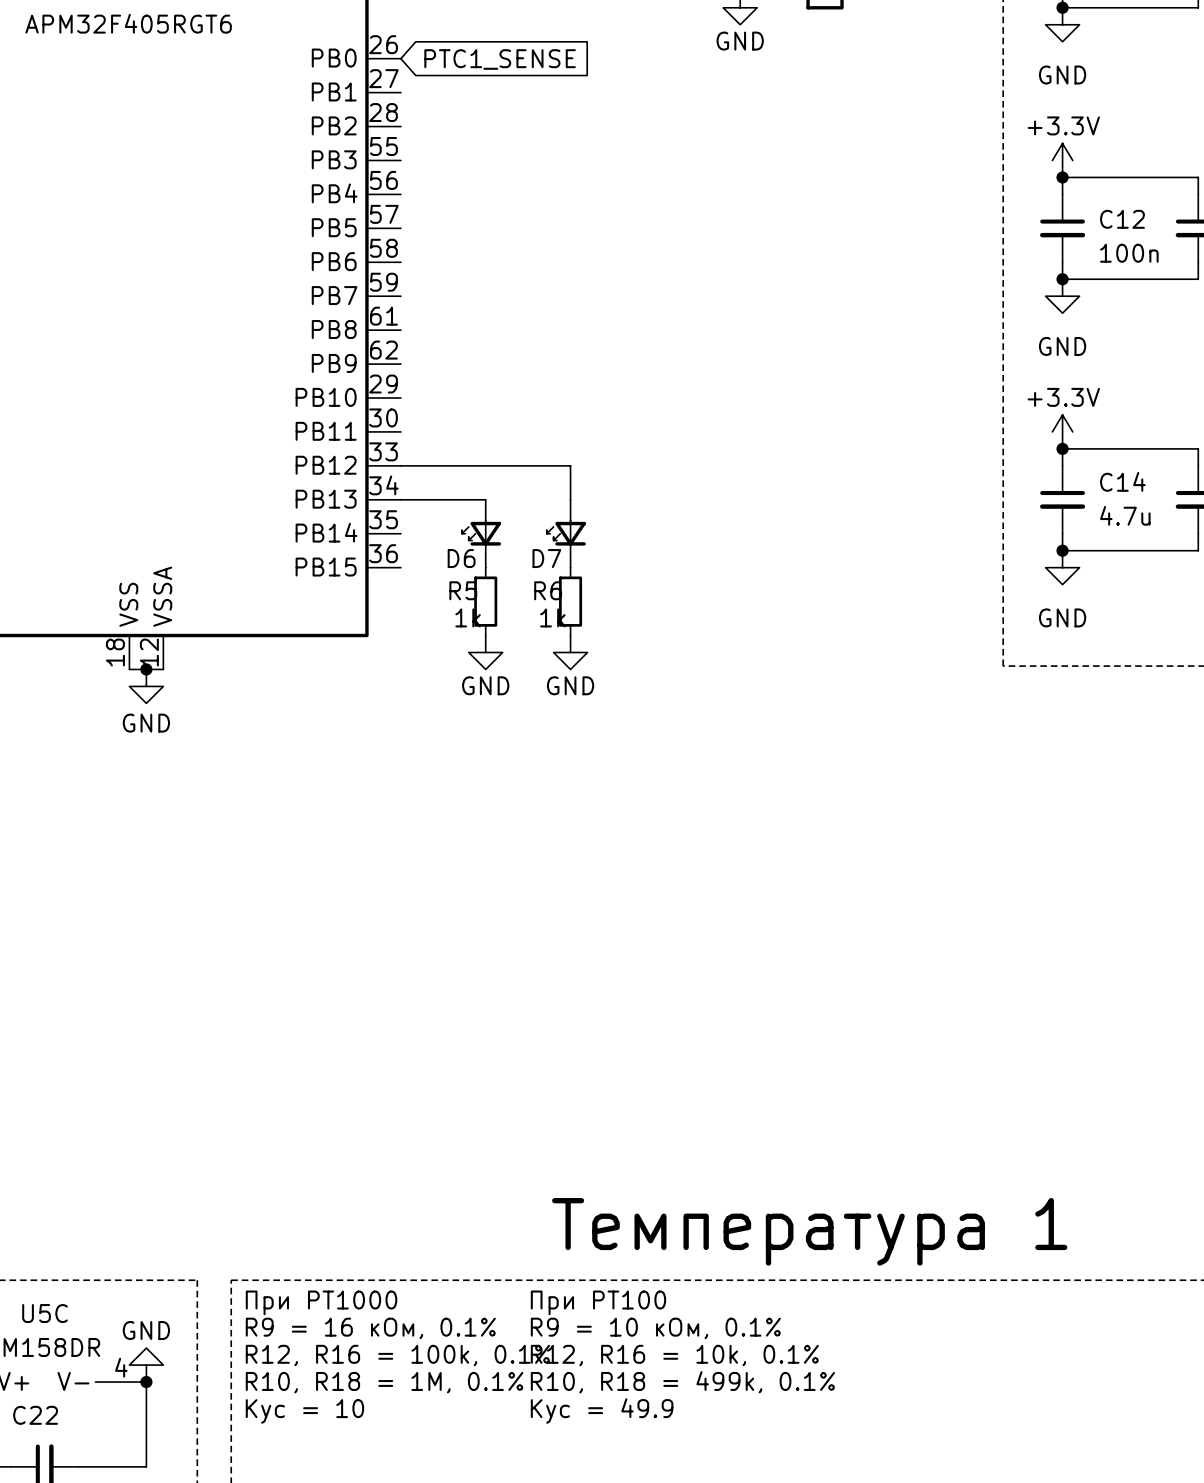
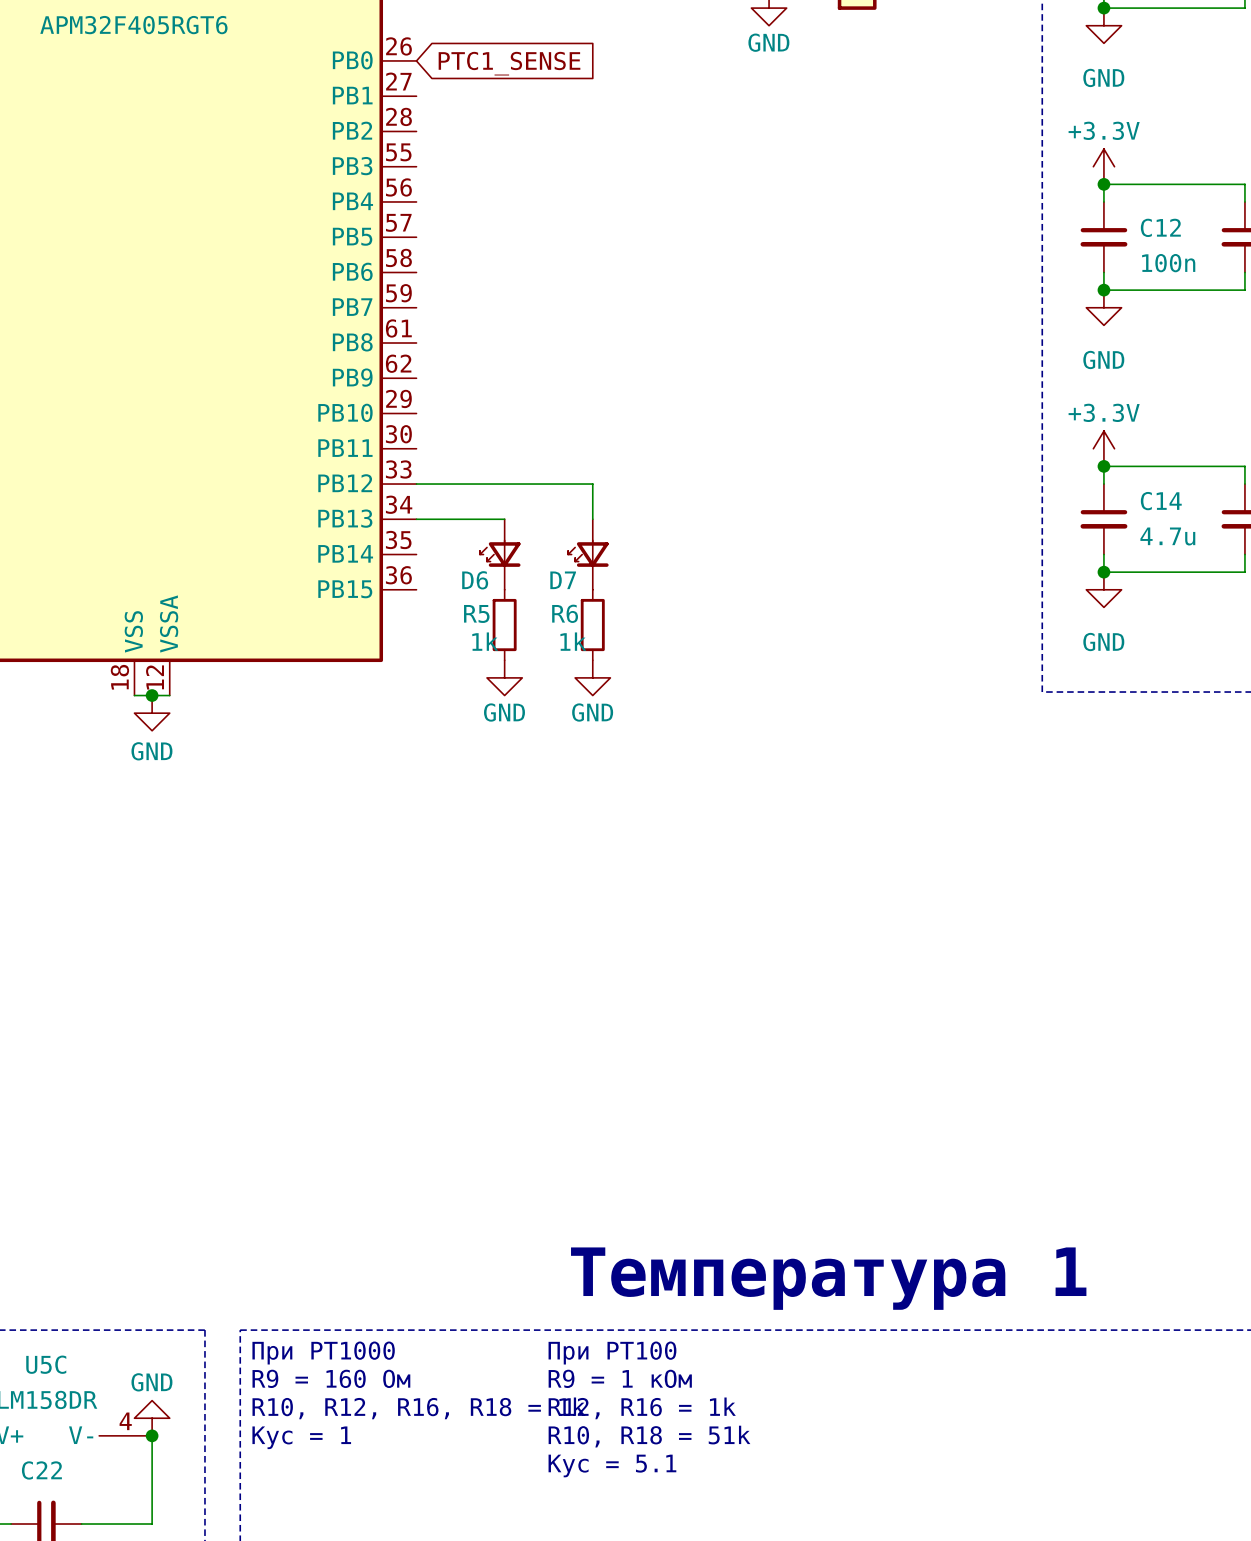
text: R9 = 16 кОм, 0.1% (370, 1328) -> R9 = 160 Ом (331, 1378)
text: R9 = 10 кОм, 0.1% (655, 1328) -> R9 = 1 кОм (620, 1378)
text: R12, R16 = 100k, 0.1% (397, 1355) -> R10, R12, R16, R18 = 1k (418, 1408)
text: R12, R16 = 10k, 0.1% (674, 1355) -> R12, R16 = 1k (642, 1408)
text: R10, R18 = 1M, 0.1% (384, 1382) -> Кус = 1 (301, 1437)
text: R10, R18 = 499k, 0.1% (682, 1382) -> R10, R18 = 51k (649, 1436)
text: Кус = 10 (304, 1411) -> none
text: Кус = 49.9 (602, 1411) -> Кус = 5.1 (612, 1465)

